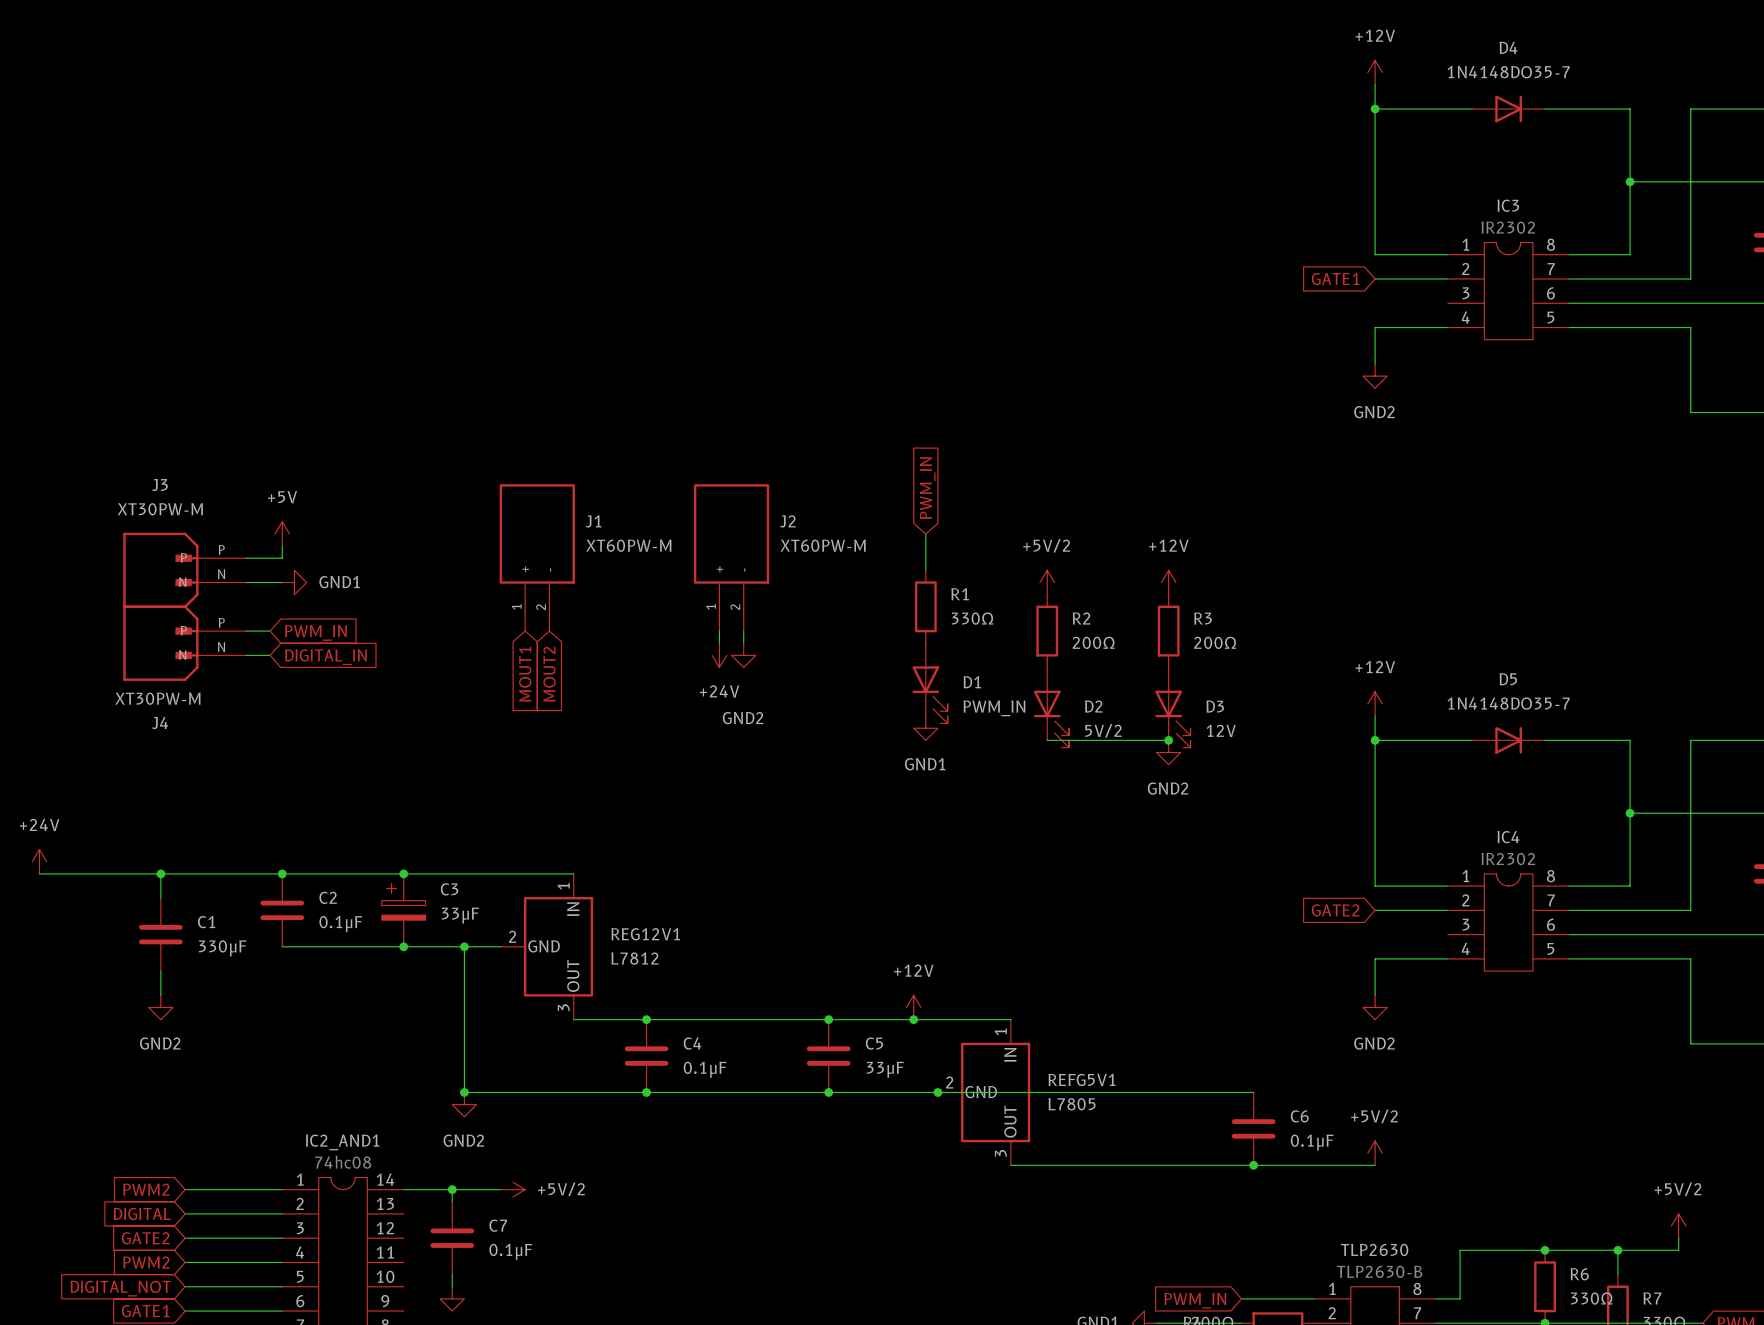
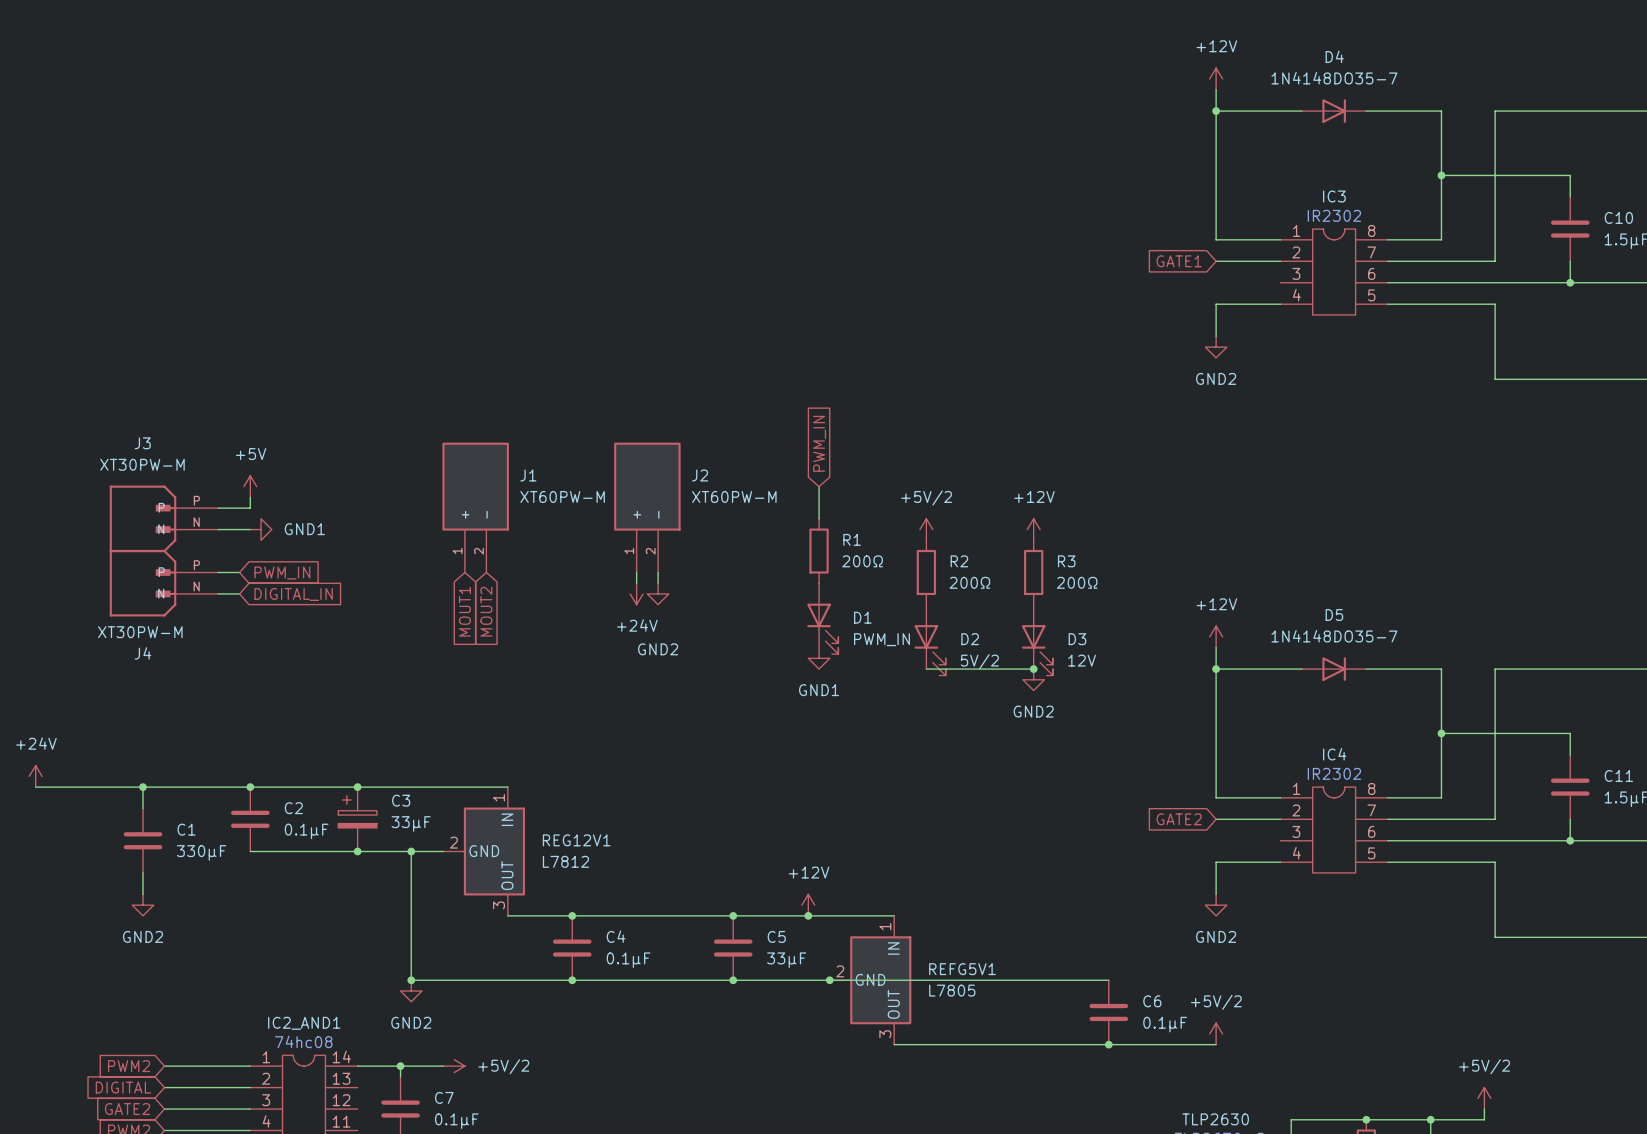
R1 value: 330Ω (972, 618) -> 200Ω (862, 561)

